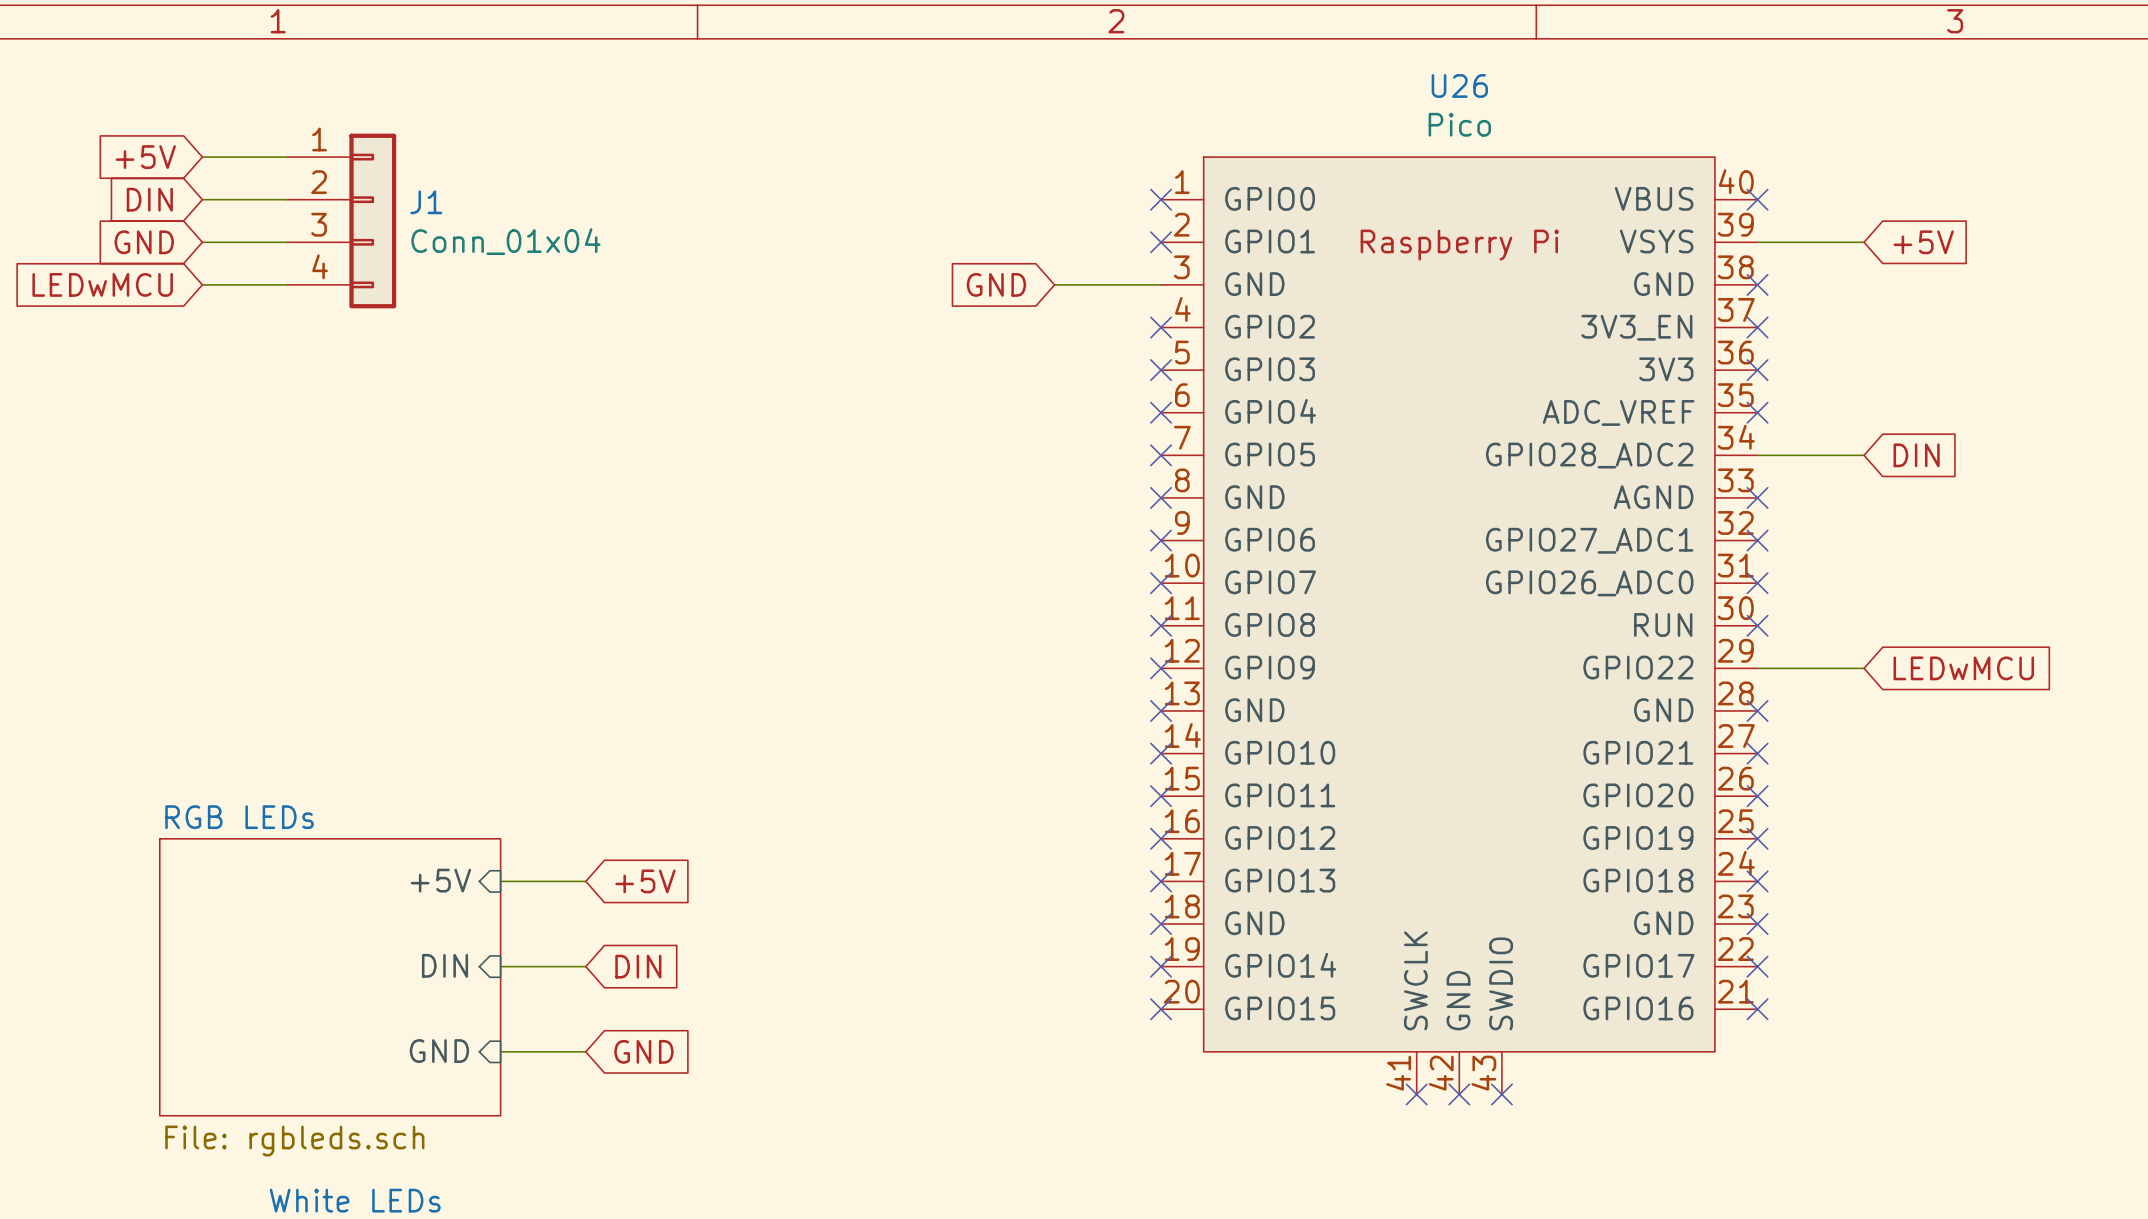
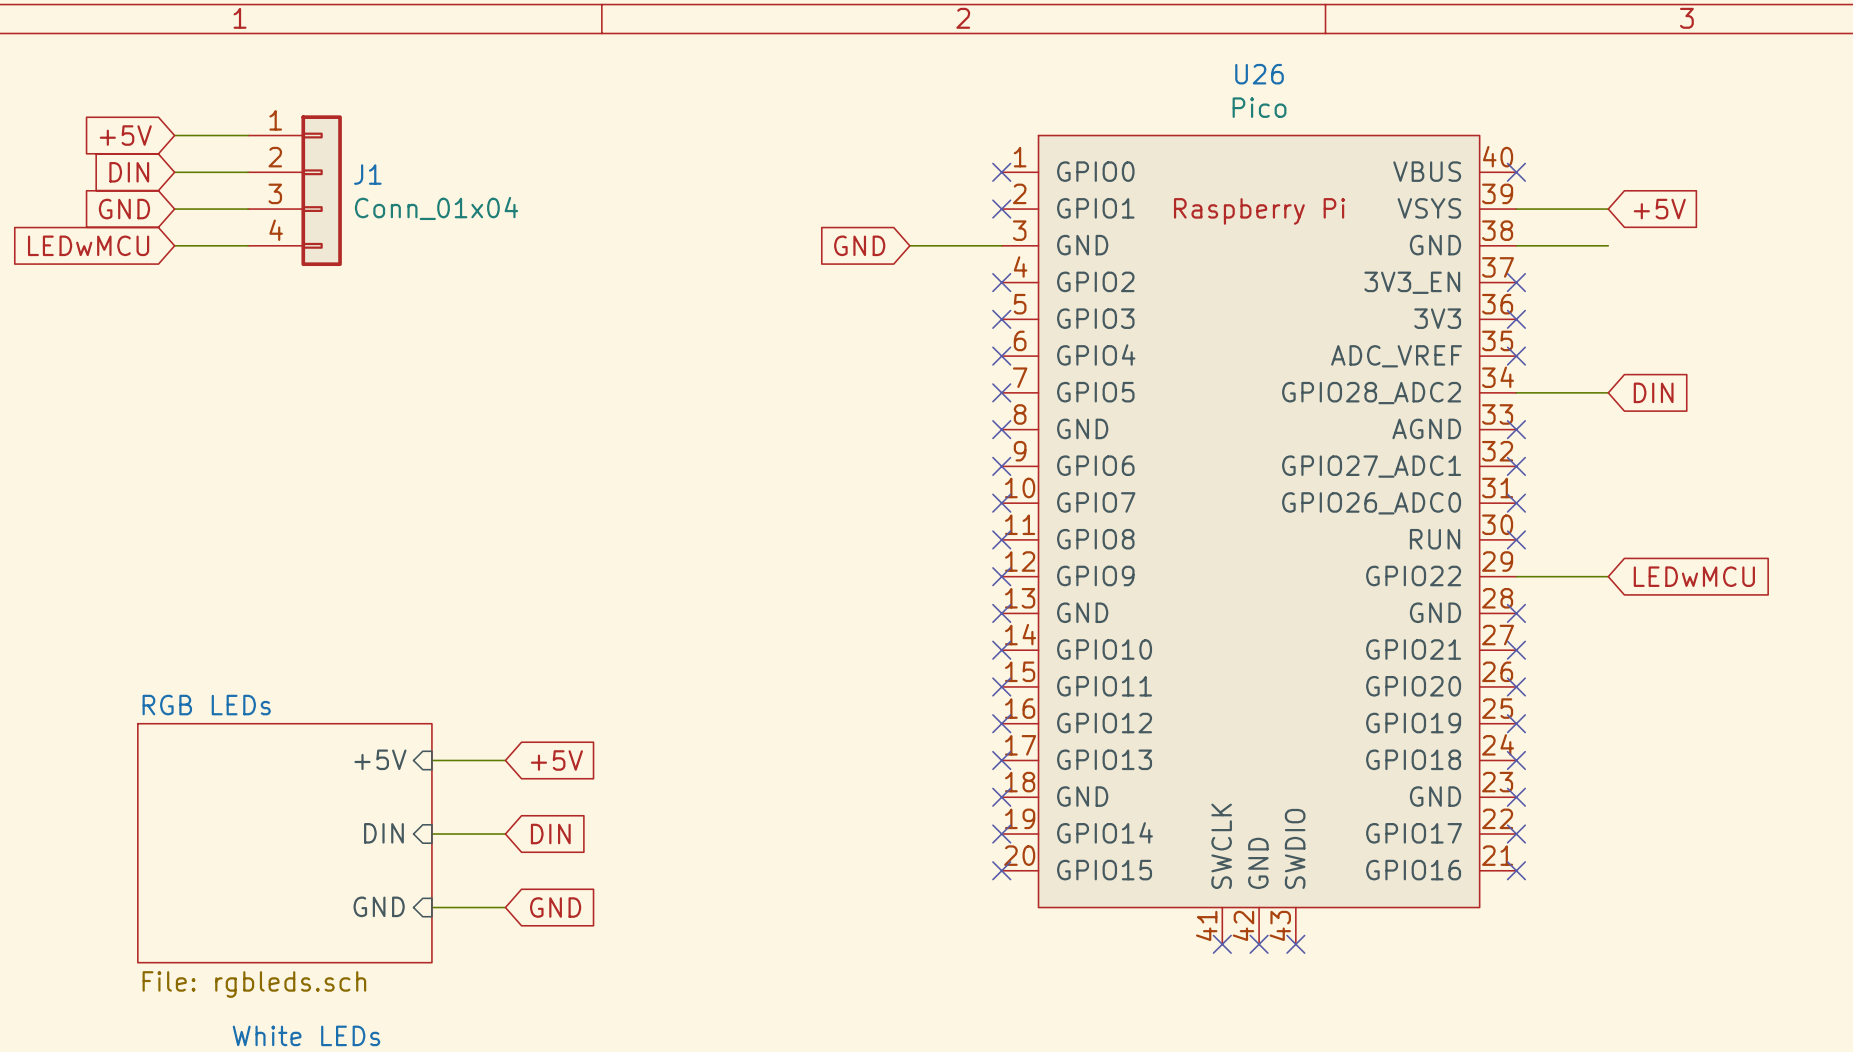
wire: none -> (1516, 245) (1608, 245)
no-connect mark: (1757, 284) -> none

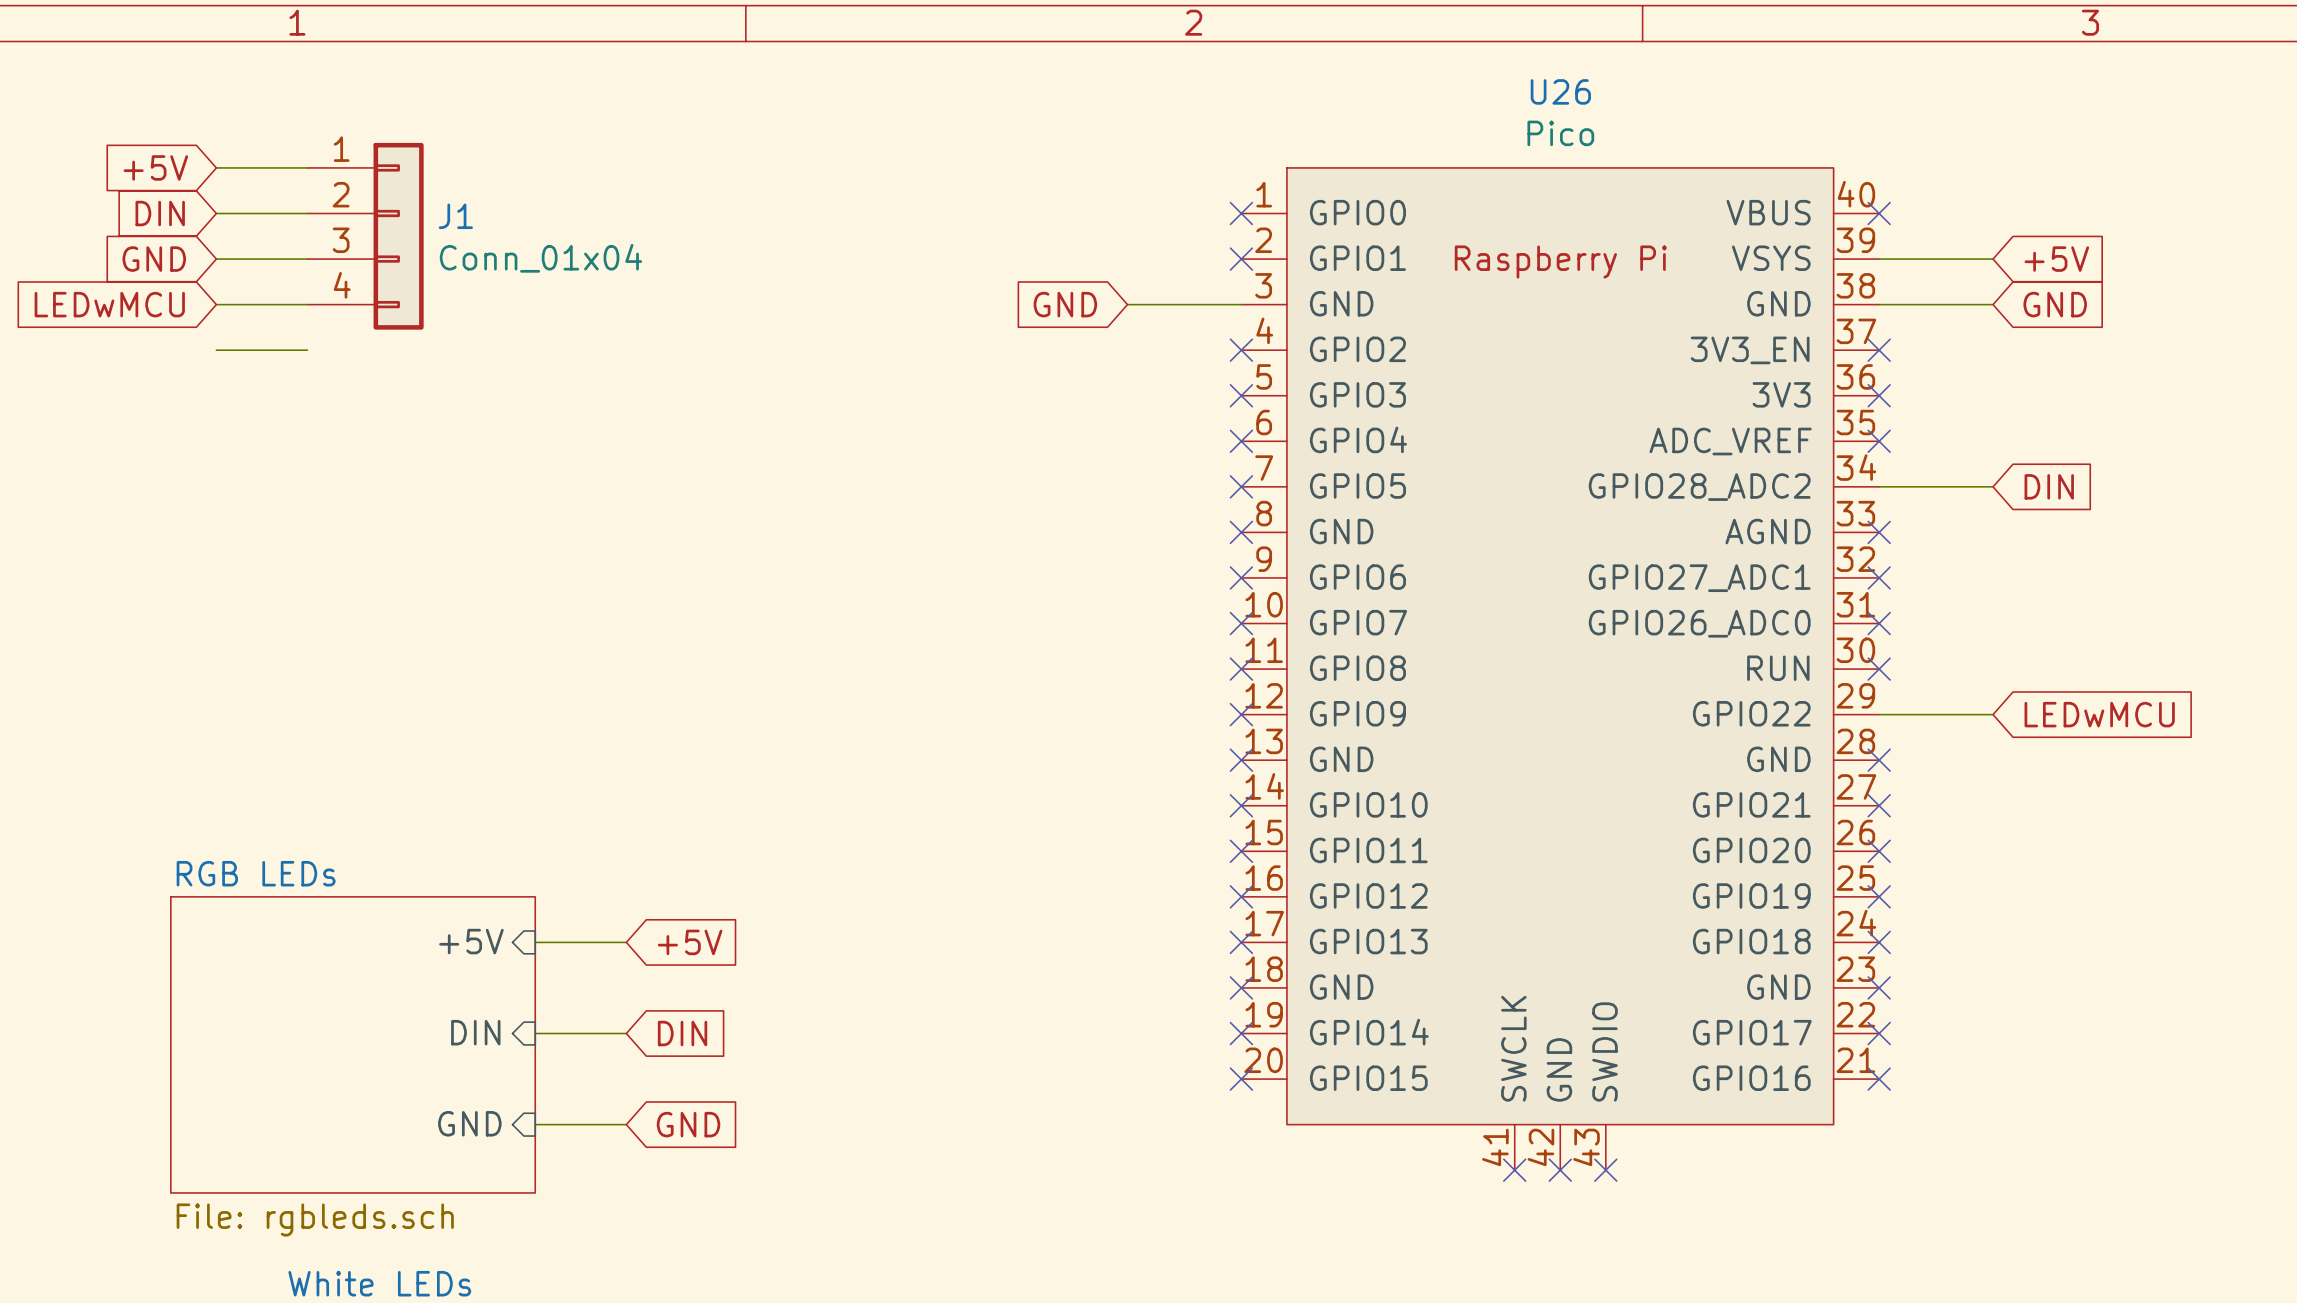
global label: none -> GND (2055, 304)
wire: none -> (216, 350) (307, 350)

